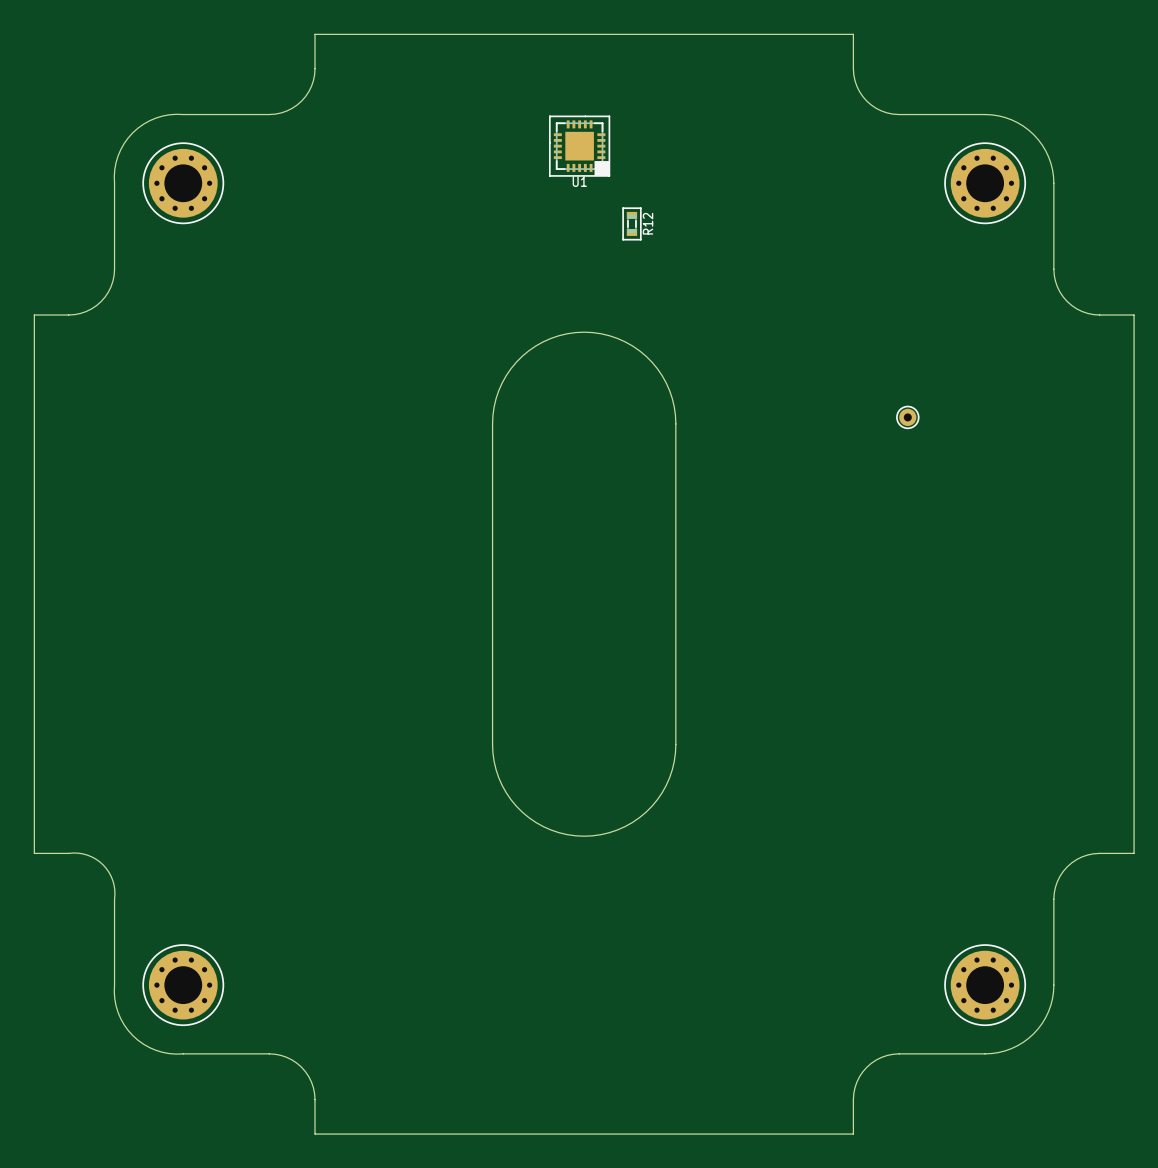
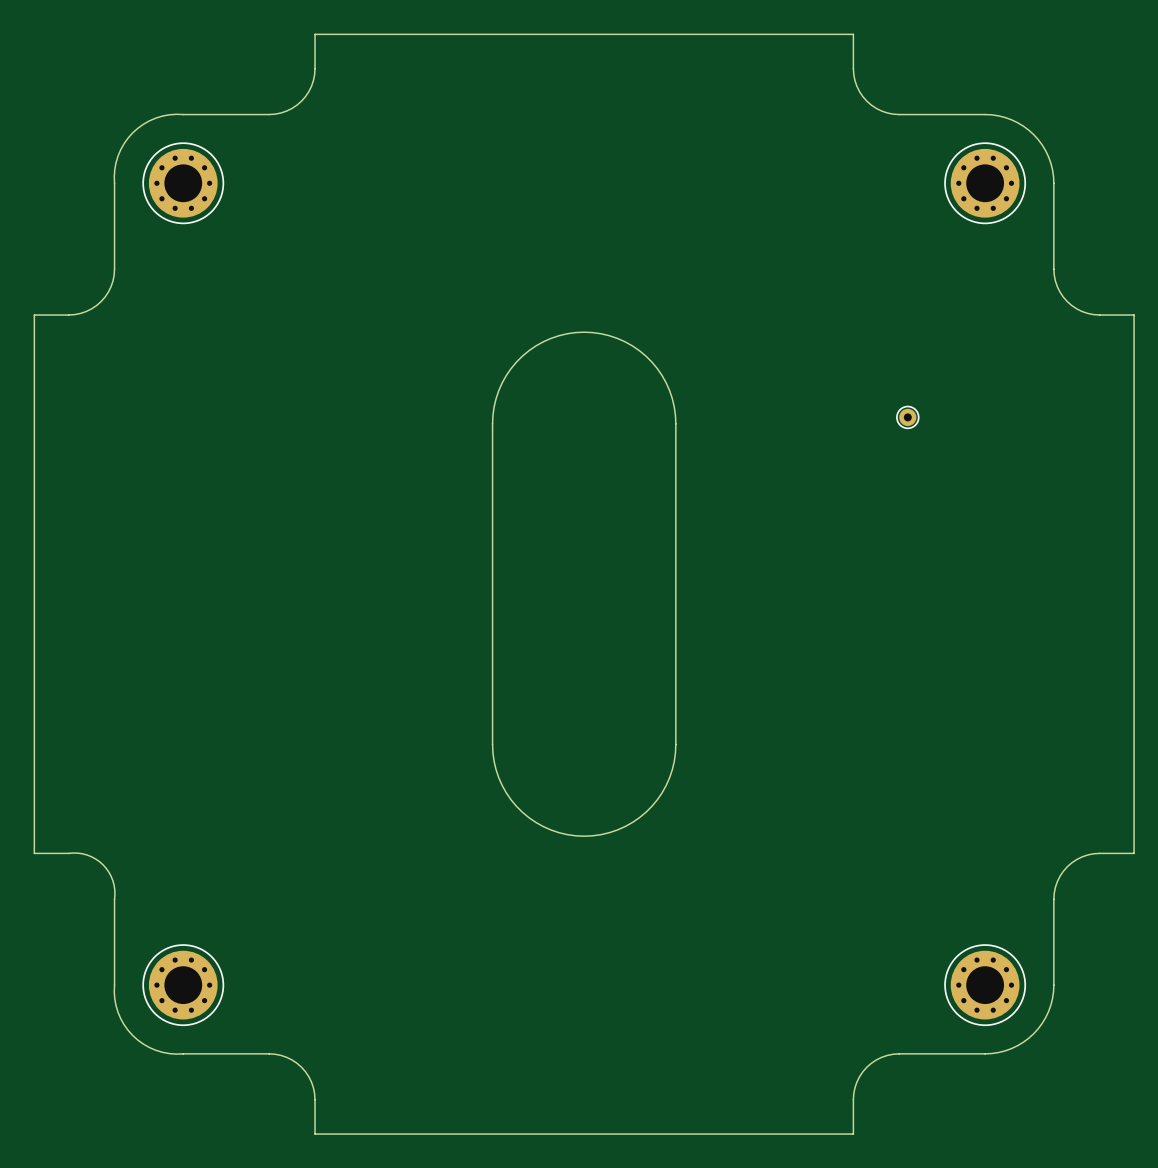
U1: (579, 146) -> none
R12: (631, 223) -> none

